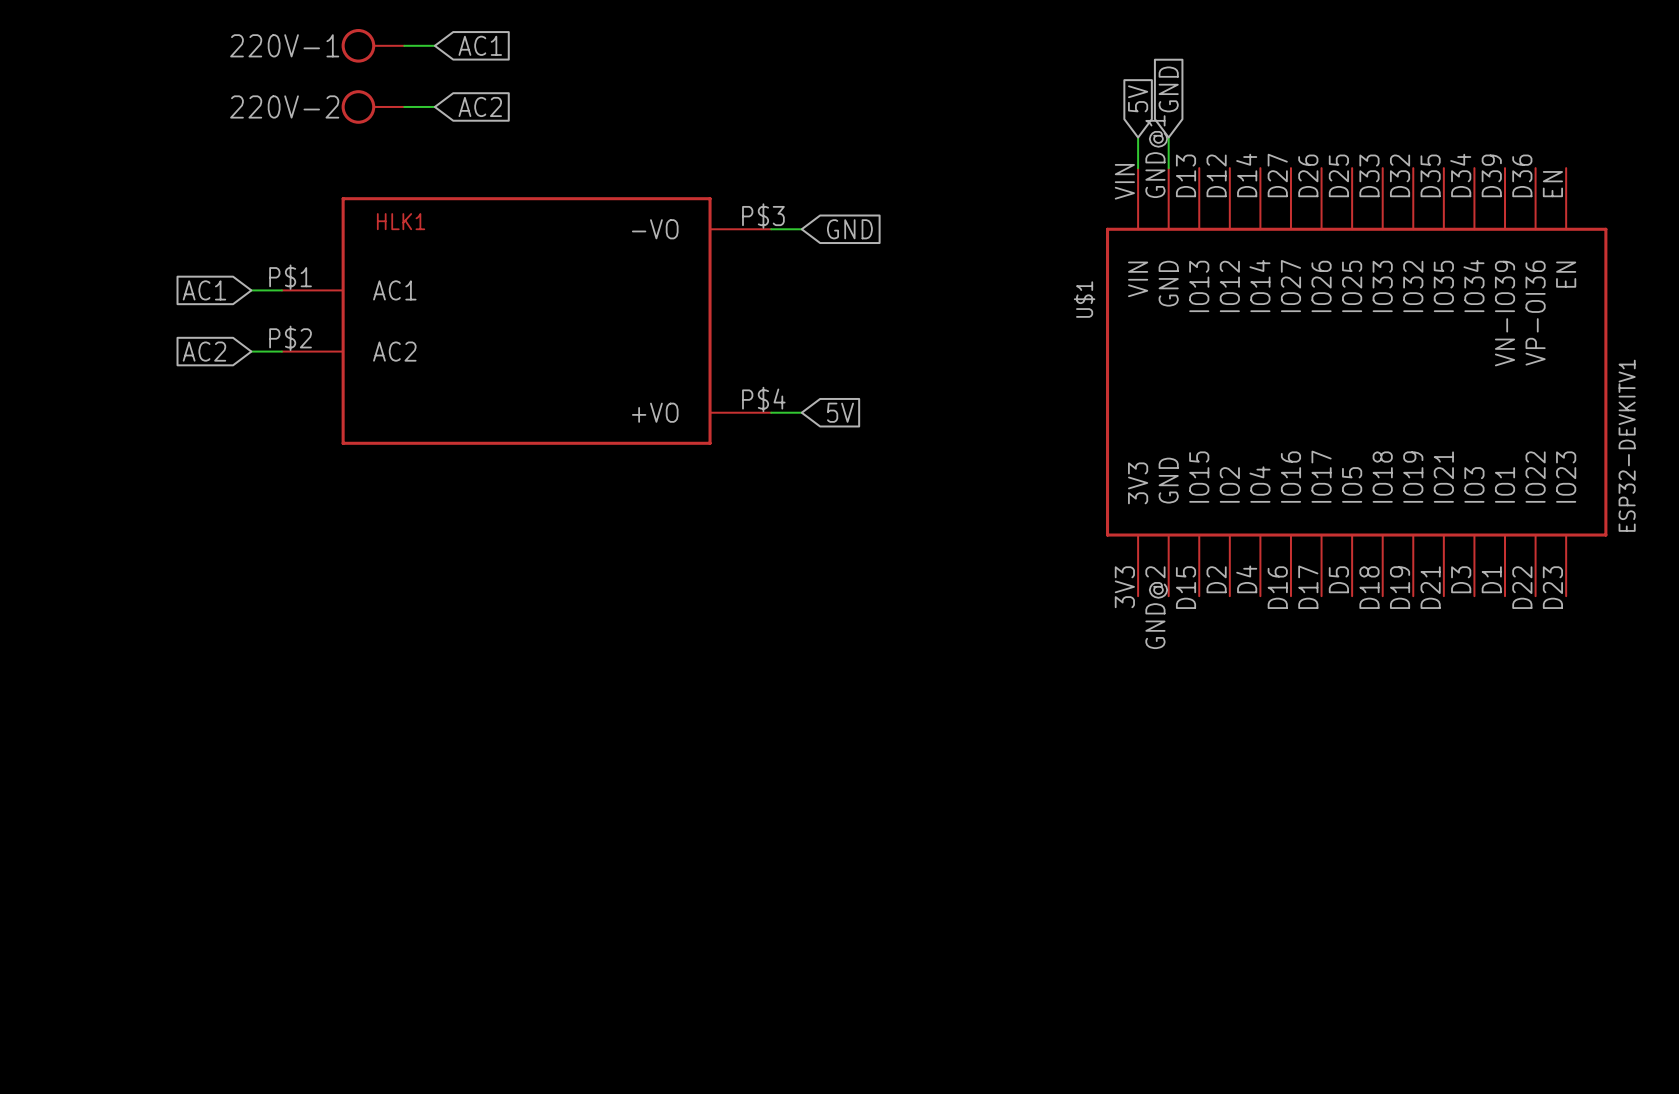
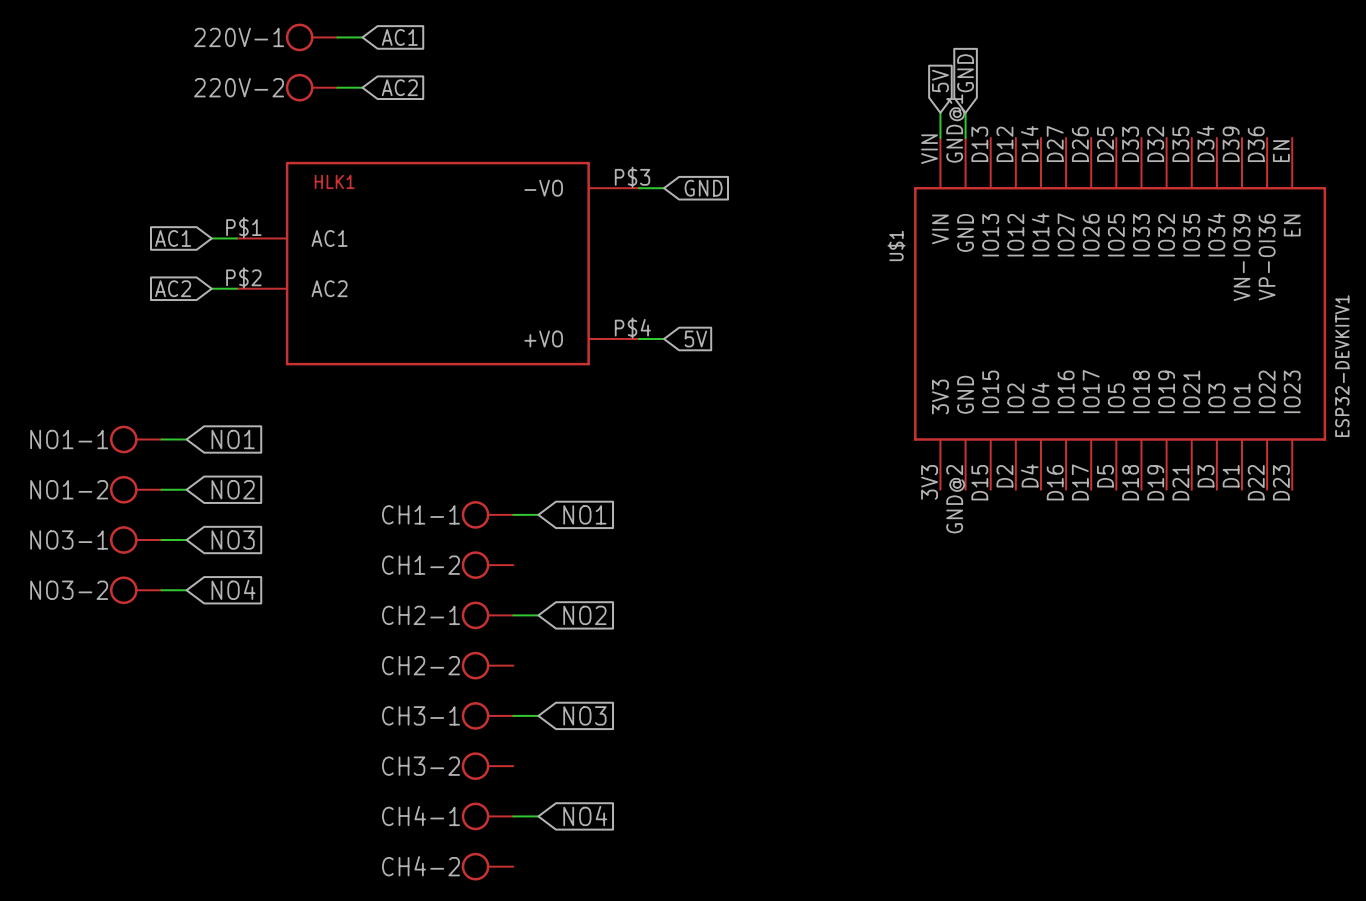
NO1-1: none -> (135, 439)
wire: none -> (161, 439) (186, 439)
global label: none -> NO1 (233, 439)
NO1-2: none -> (135, 489)
wire: none -> (161, 489) (186, 489)
global label: none -> NO2 (233, 489)
CH1-1: none -> (487, 514)
wire: none -> (513, 514) (538, 514)
global label: none -> NO1 (584, 514)
NO3-1: none -> (135, 540)
wire: none -> (161, 540) (186, 540)
global label: none -> NO3 (233, 540)
CH1-2: none -> (487, 565)
global label: none -> NO4 (233, 589)
NO3-2: none -> (135, 590)
wire: none -> (161, 590) (186, 590)
CH2-1: none -> (487, 615)
wire: none -> (513, 615) (538, 615)
global label: none -> NO2 (584, 615)
CH2-2: none -> (487, 665)
CH3-1: none -> (487, 715)
wire: none -> (513, 715) (538, 715)
global label: none -> NO3 (584, 715)
CH3-2: none -> (487, 766)
CH4-1: none -> (487, 816)
wire: none -> (513, 816) (538, 816)
global label: none -> NO4 (585, 816)
CH4-2: none -> (487, 866)

